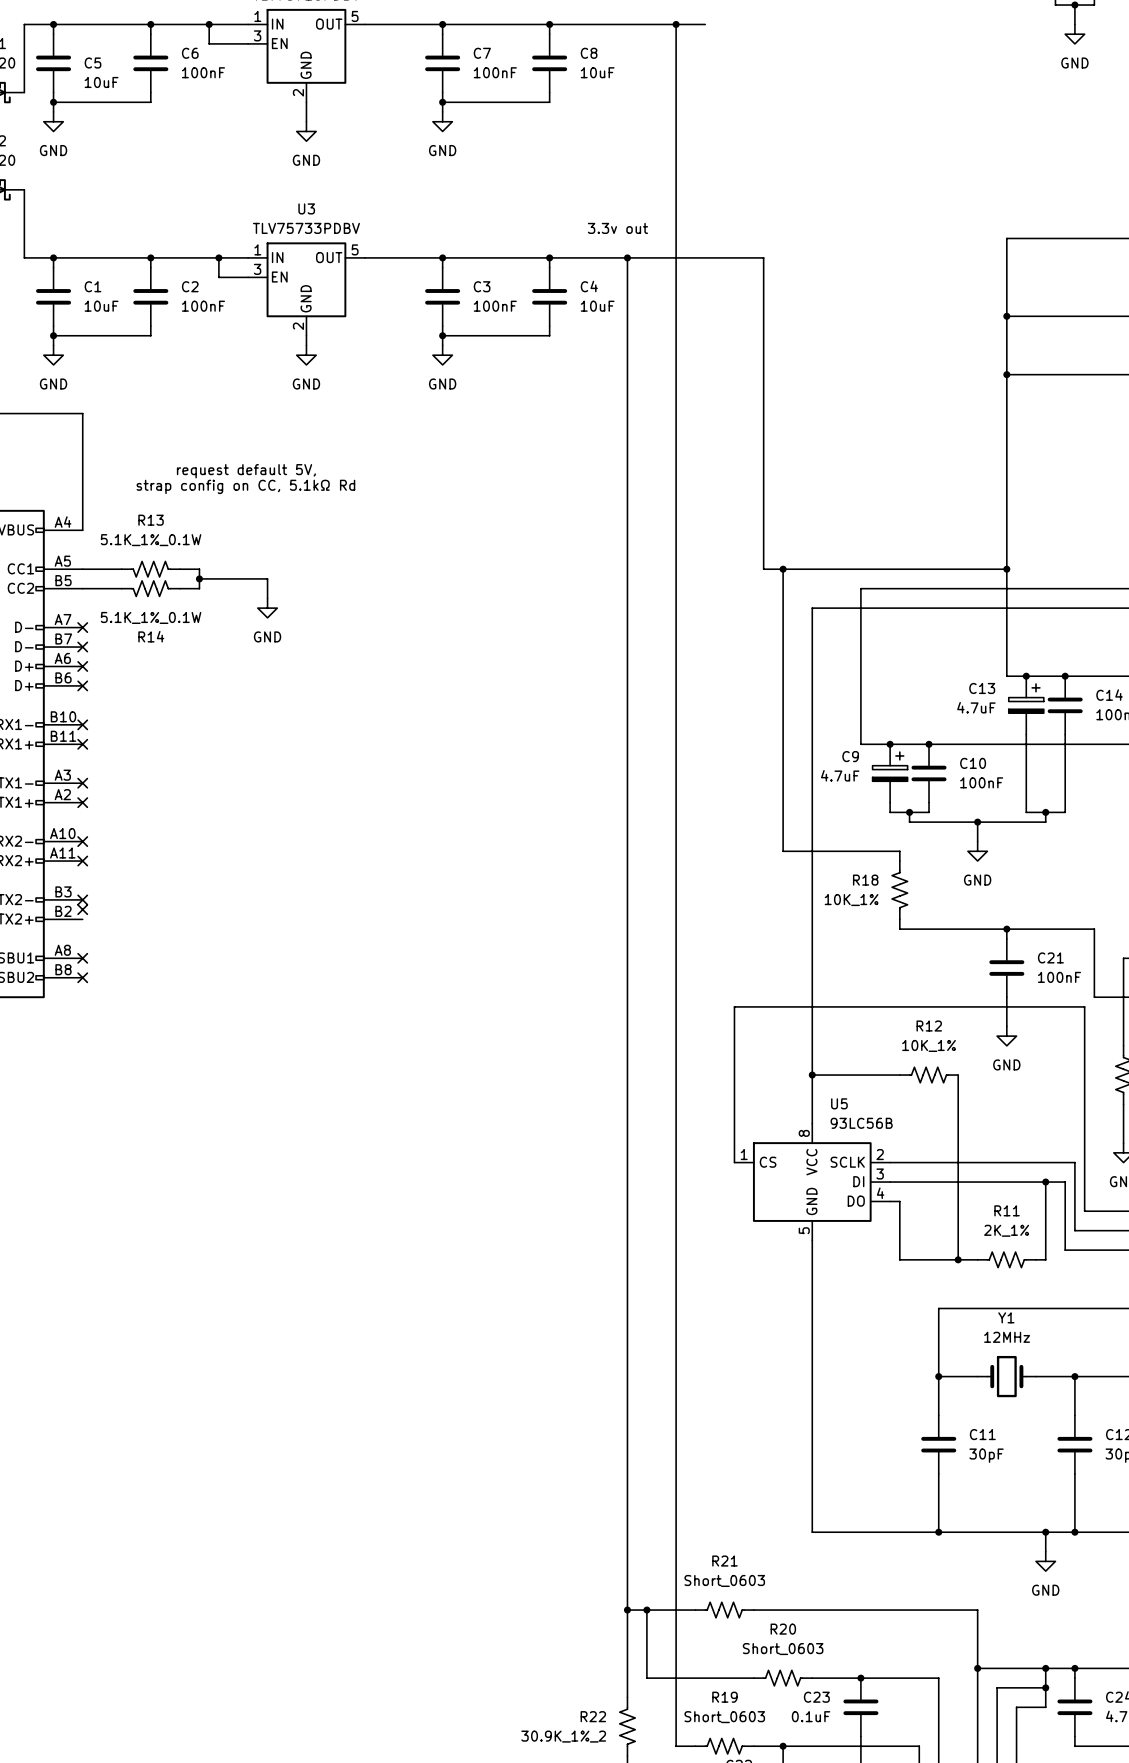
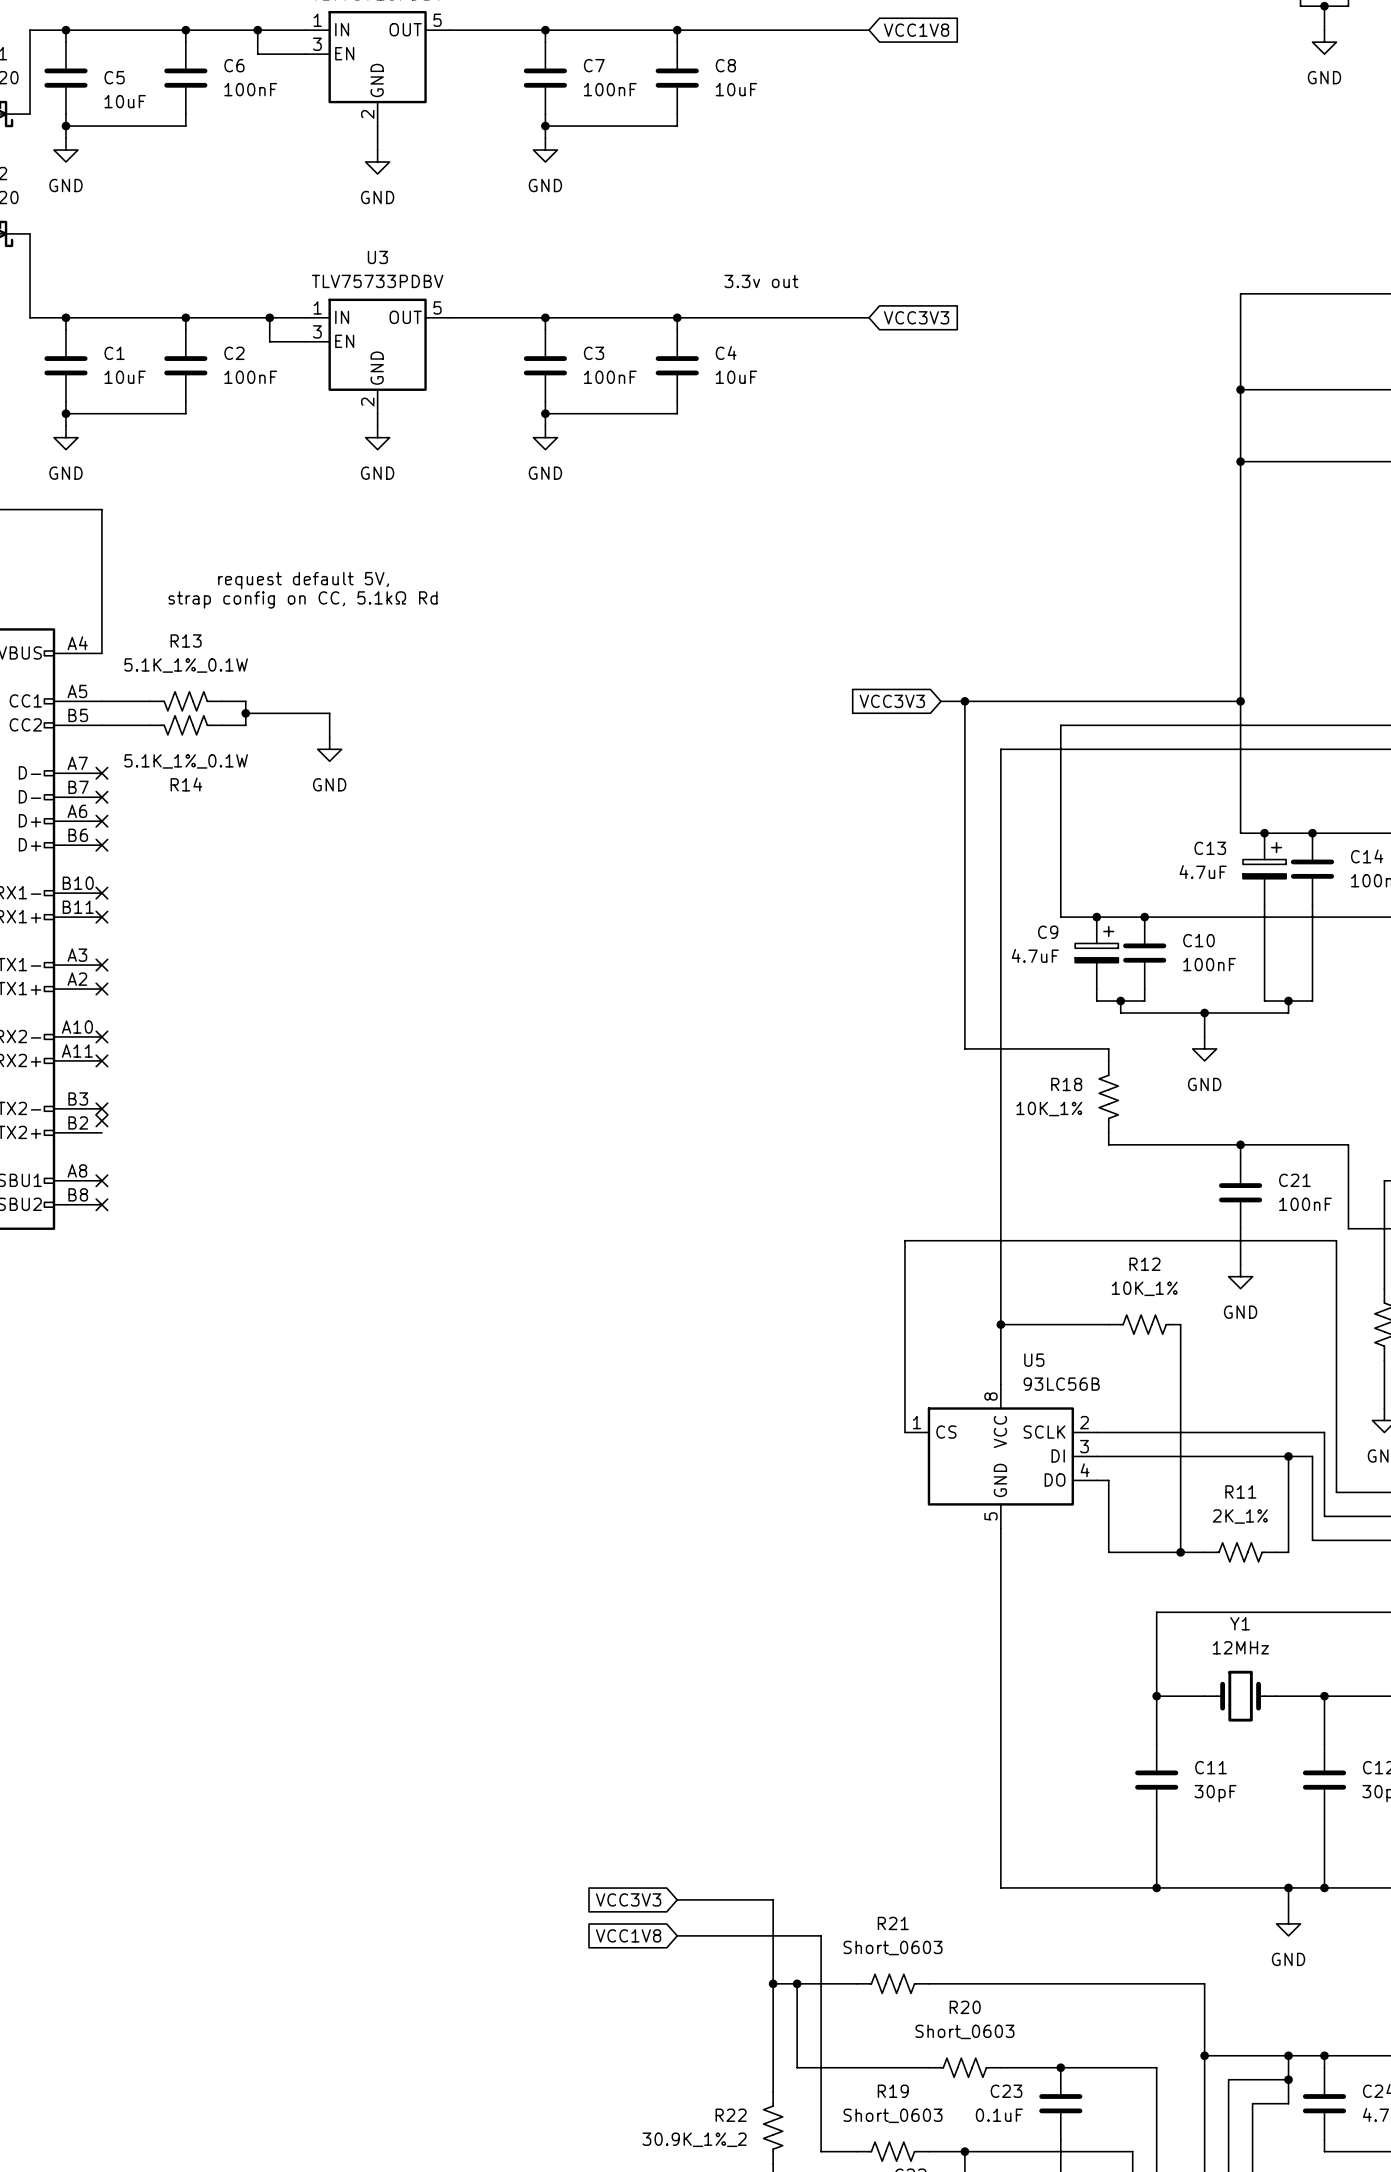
wire: (676, 24) (676, 1746) -> (677, 1935) (821, 1935) (821, 2151) (833, 2151)
junction: (676, 24) -> none
global label: none -> VCC1V8 (916, 30)
wire: (627, 257) (627, 1541) -> (677, 1899) (773, 1899)
junction: (627, 257) -> none
wire: (705, 257) (763, 257) (763, 569) -> none
global label: none -> VCC3V3 (916, 317)
global label: none -> VCC3V3 (892, 701)
global label: none -> VCC3V3 (628, 1899)
global label: none -> VCC1V8 (628, 1935)

